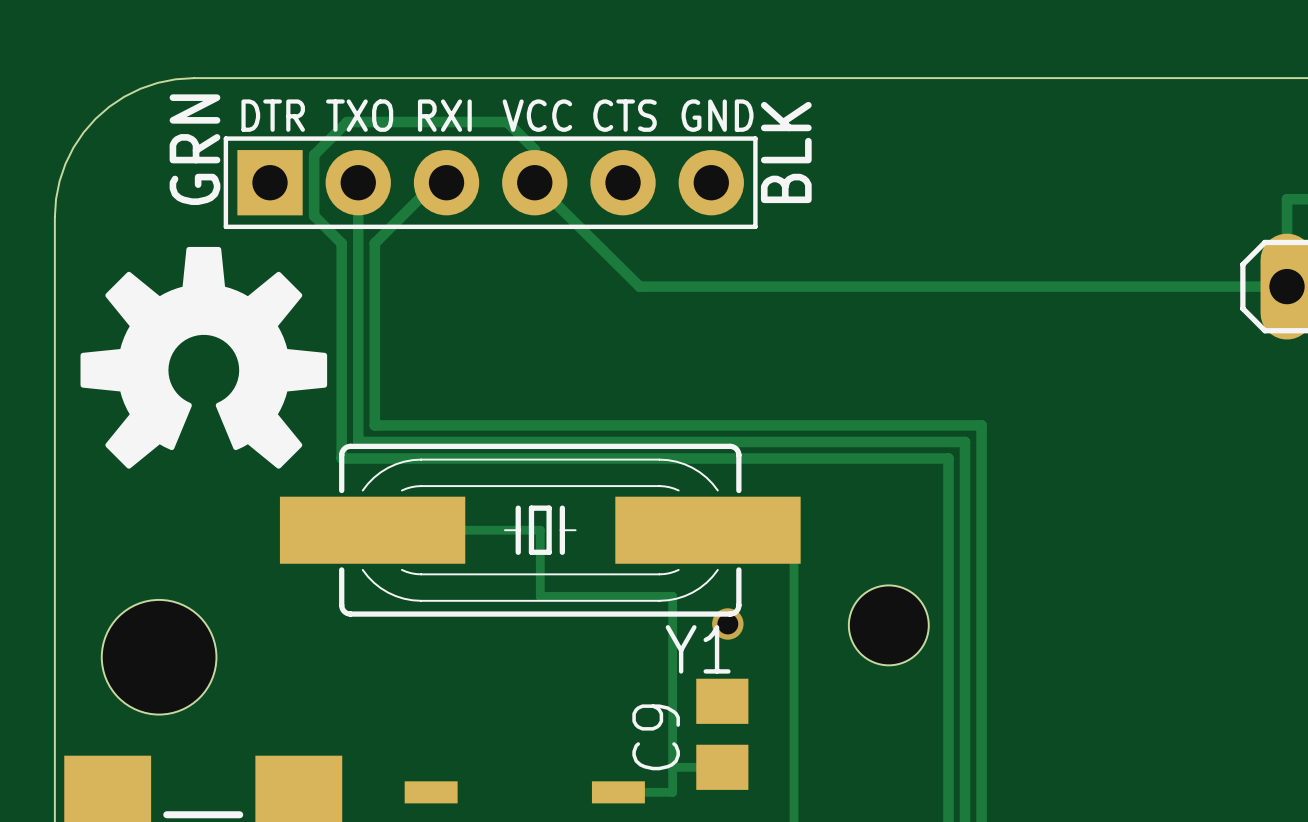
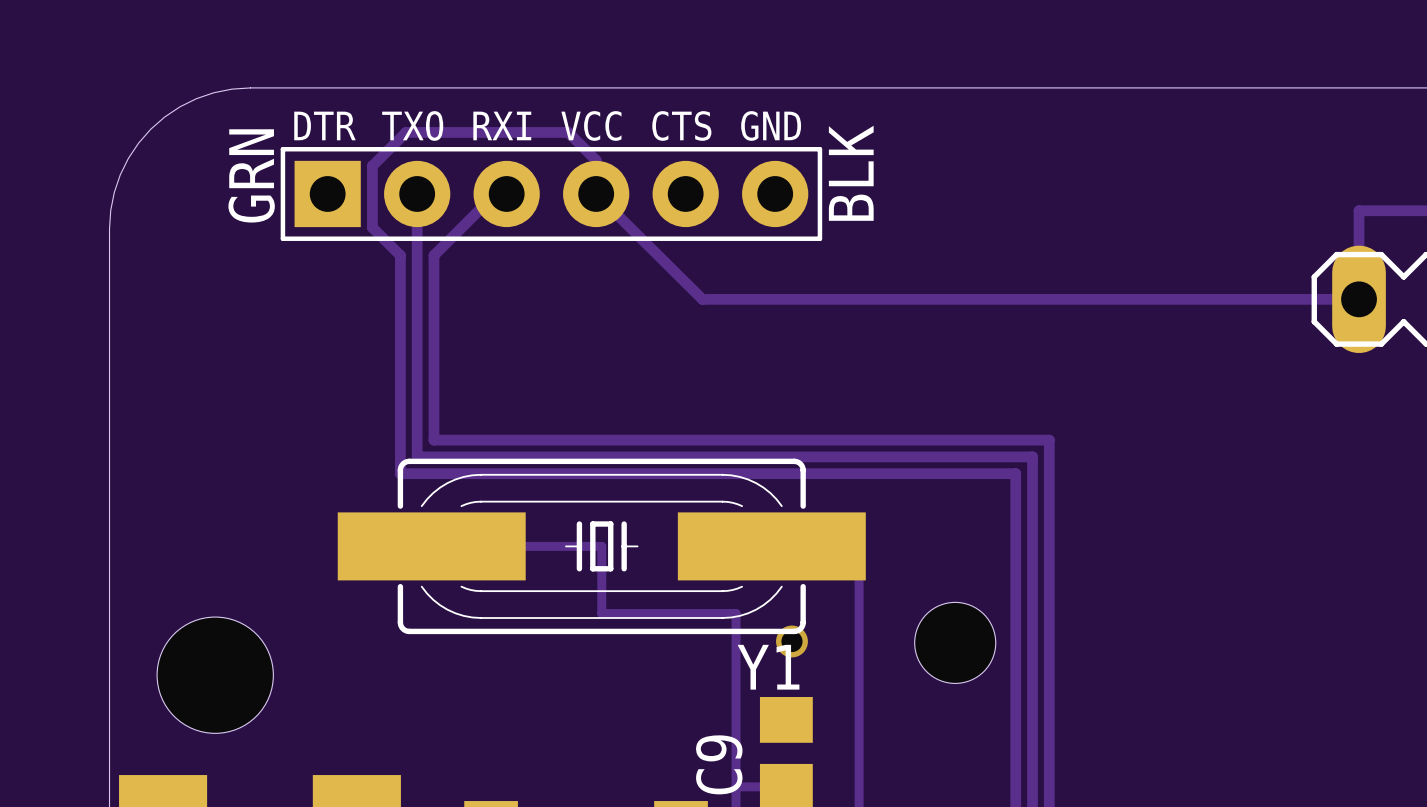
drawing: [80, 246, 328, 469] -> none

